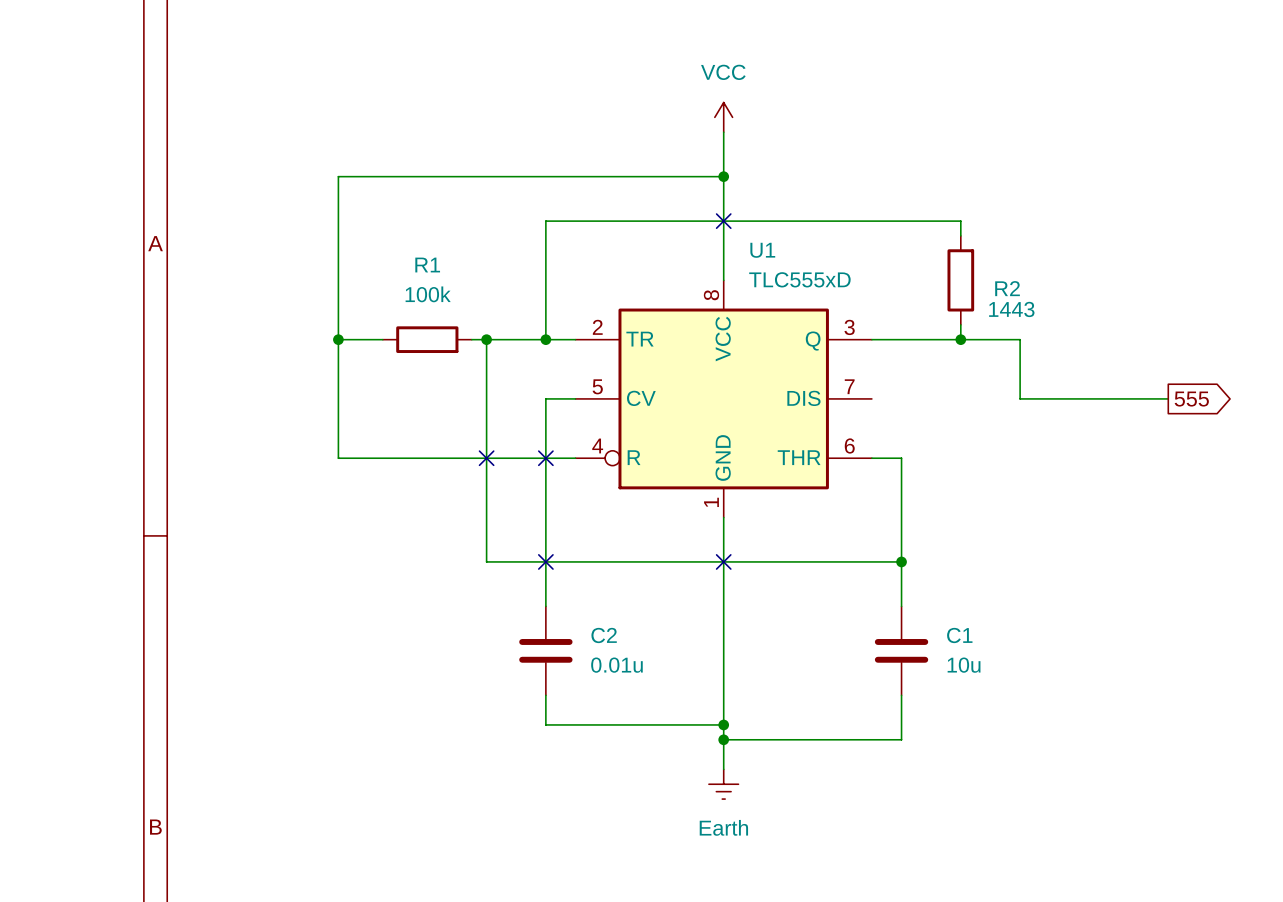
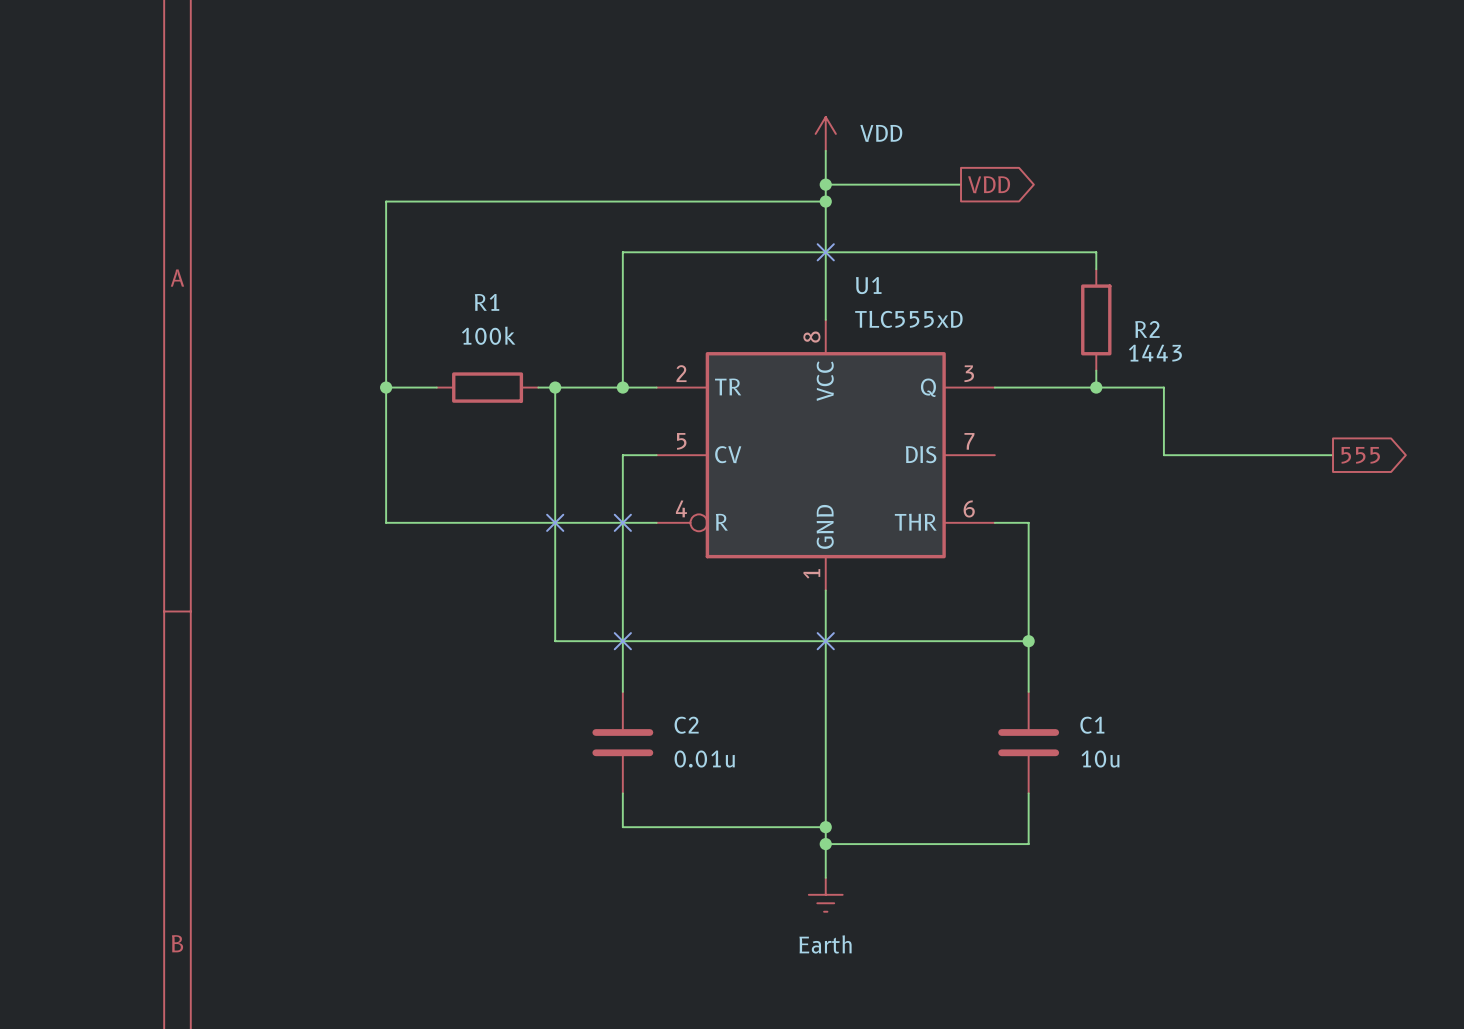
power symbol: VCC (723, 117) -> VDD (825, 133)
wire: none -> (825, 184) (961, 184)
junction: none -> (825, 184)
global label: none -> VDD (989, 184)

